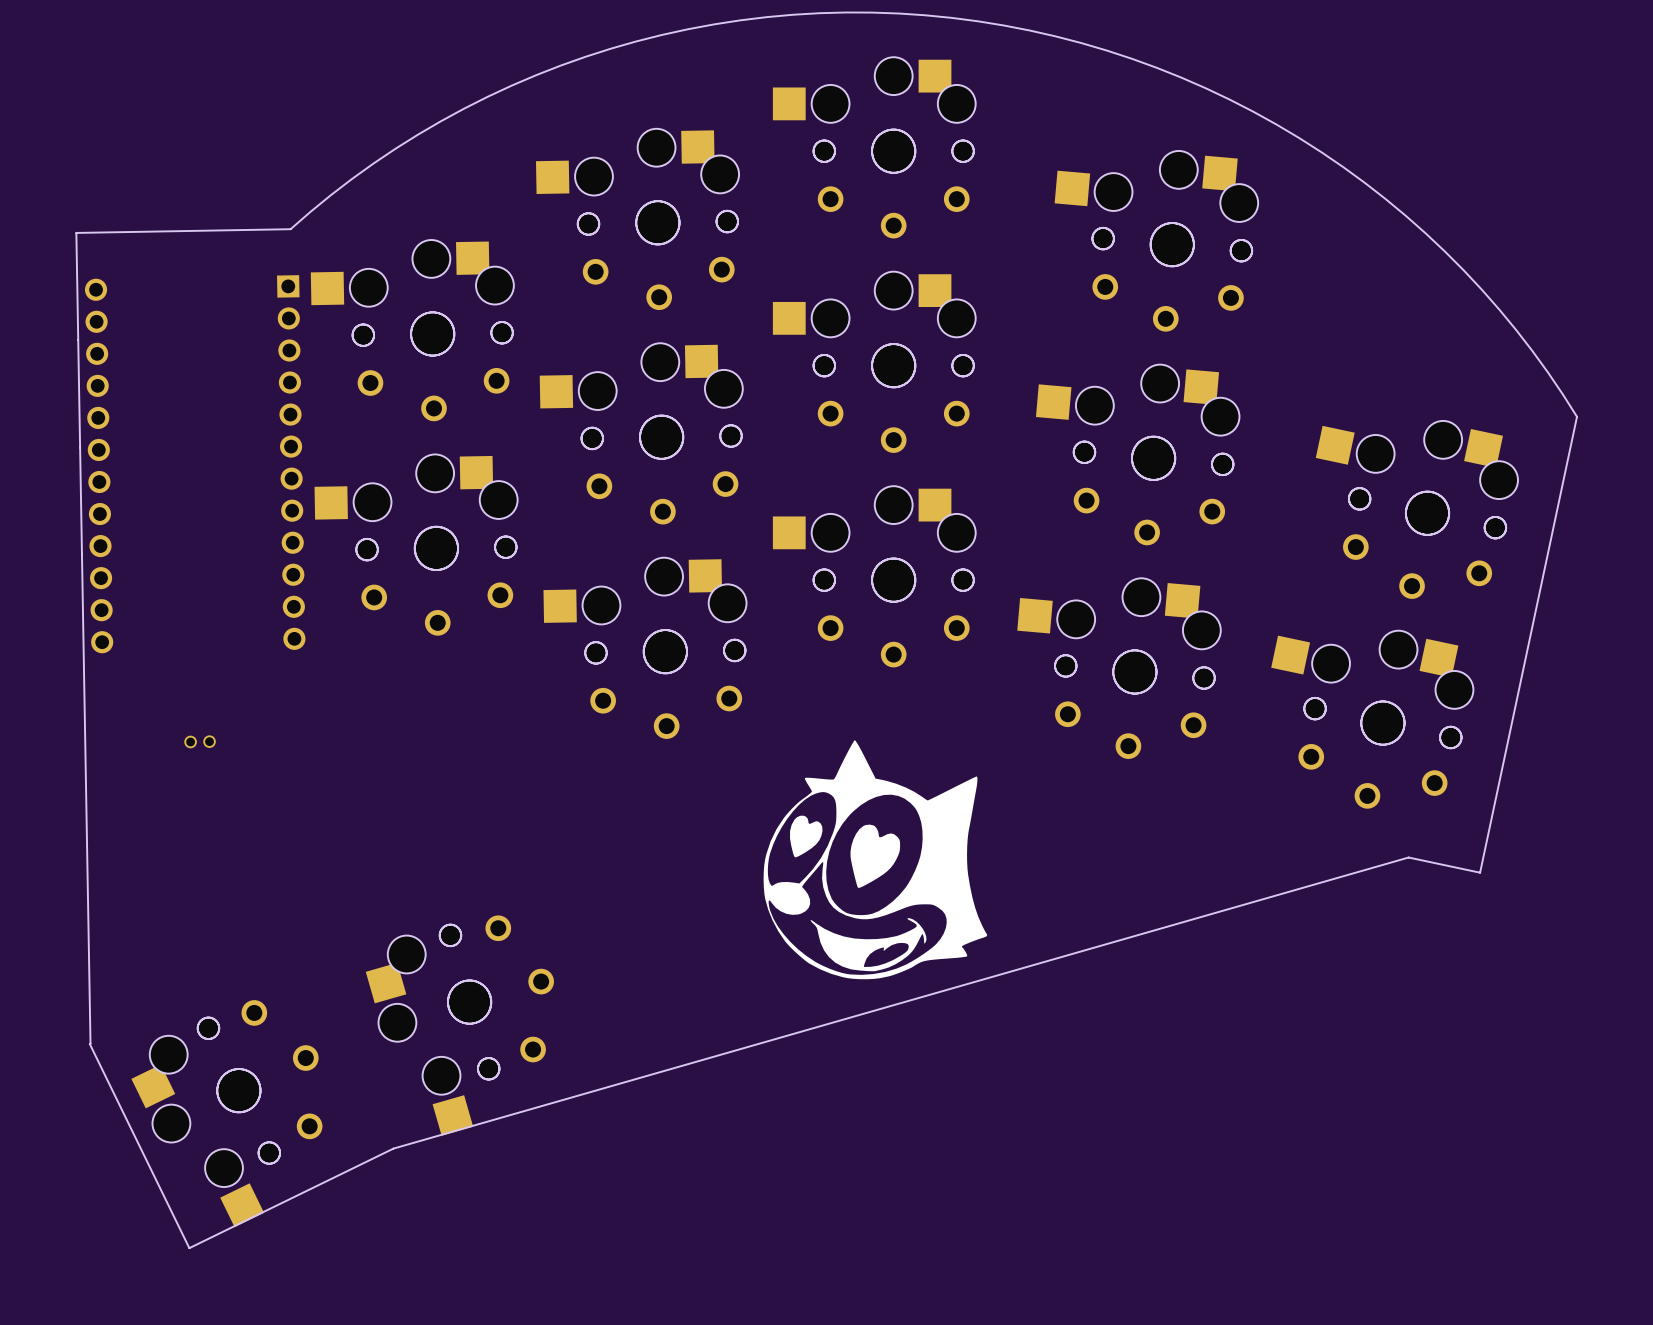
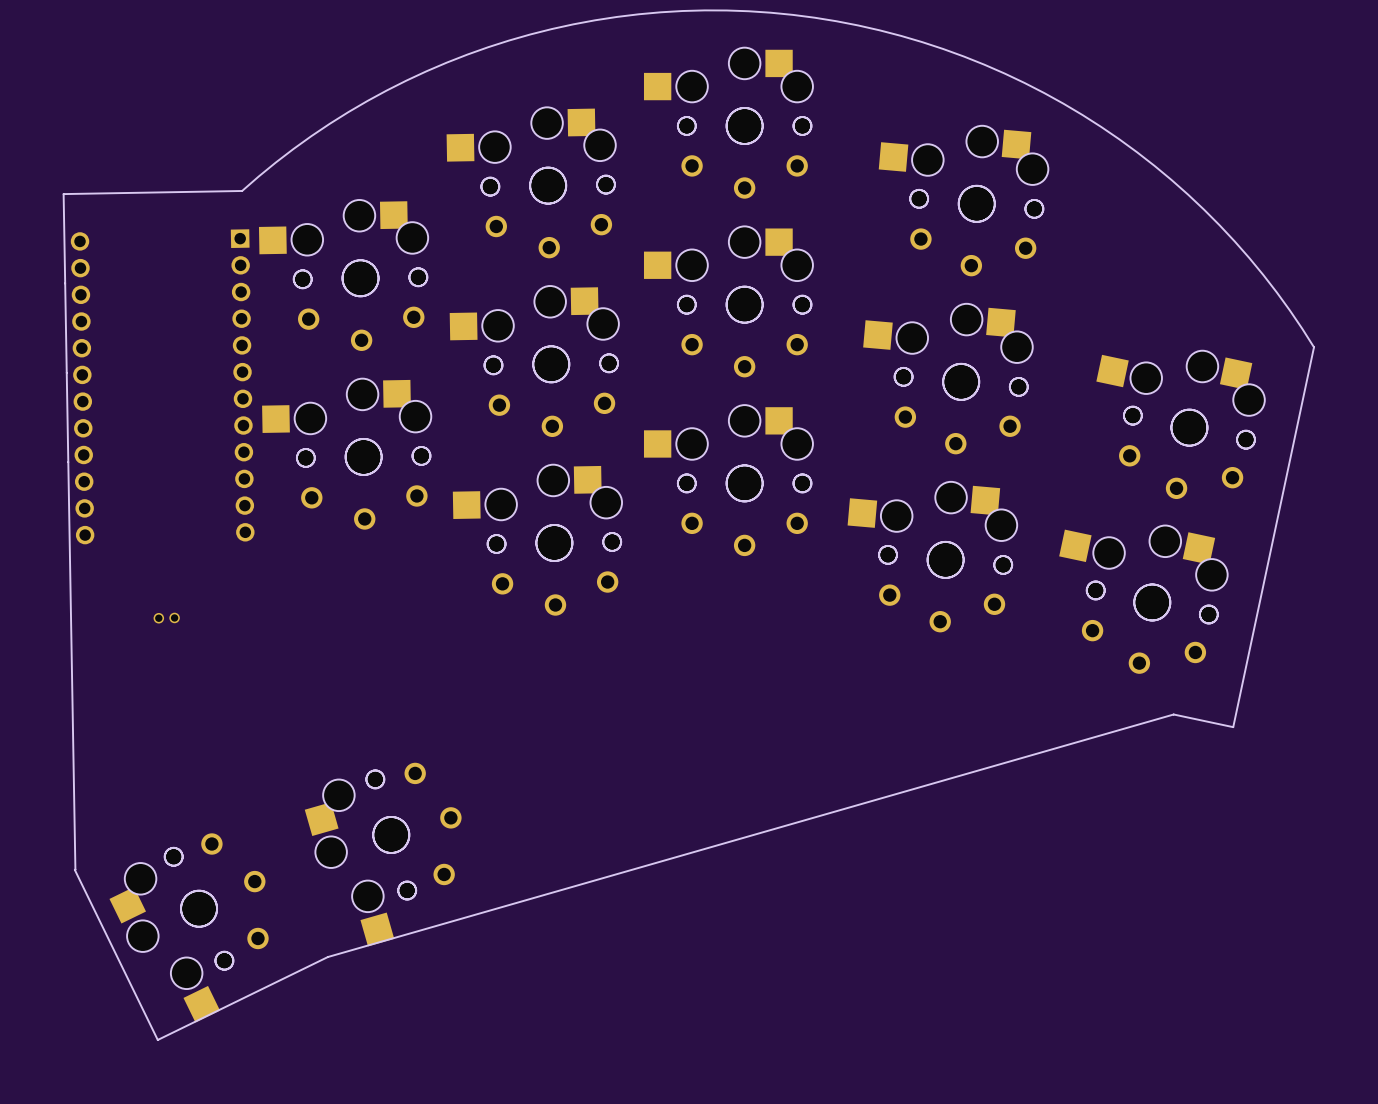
drawing: [763, 740, 988, 980] -> none

